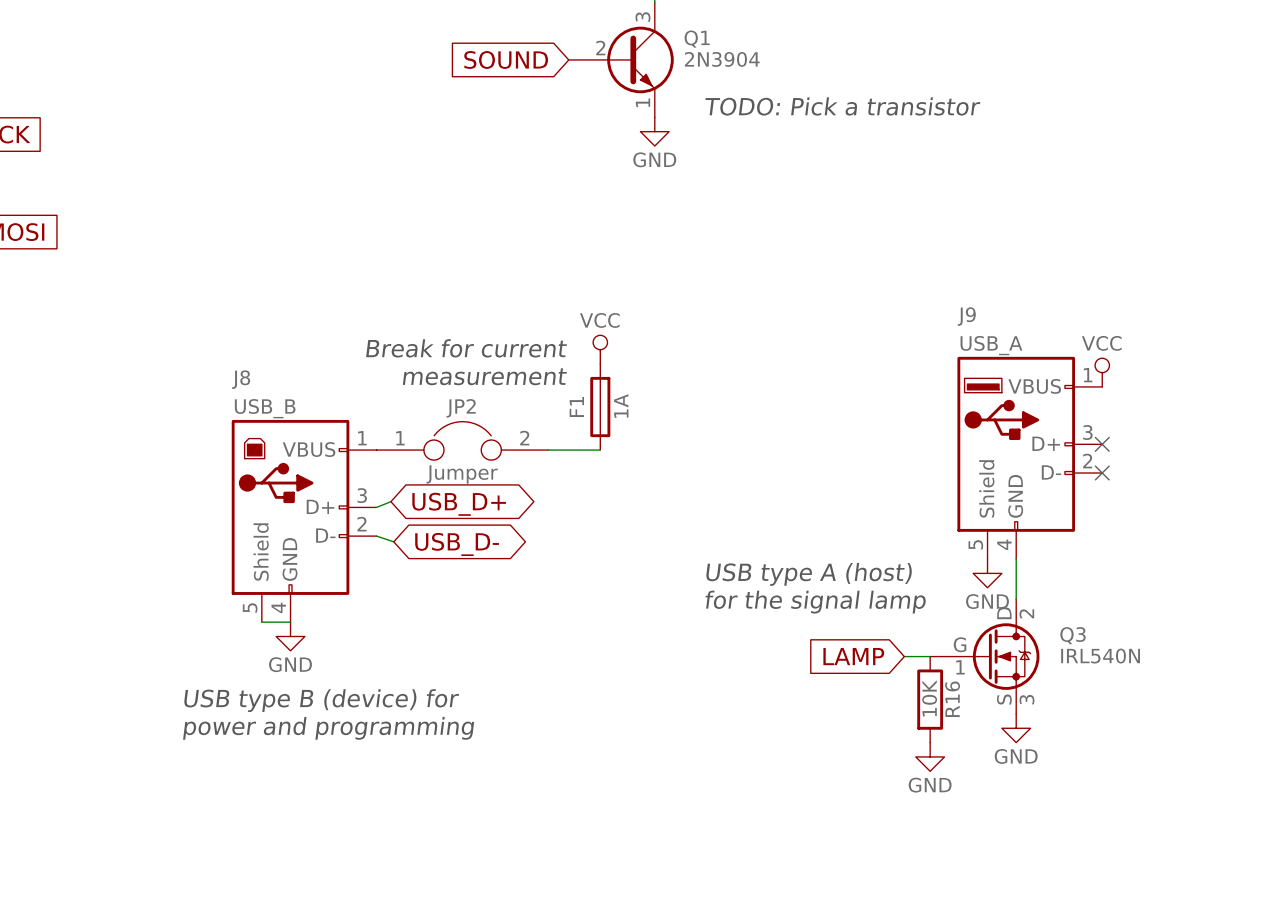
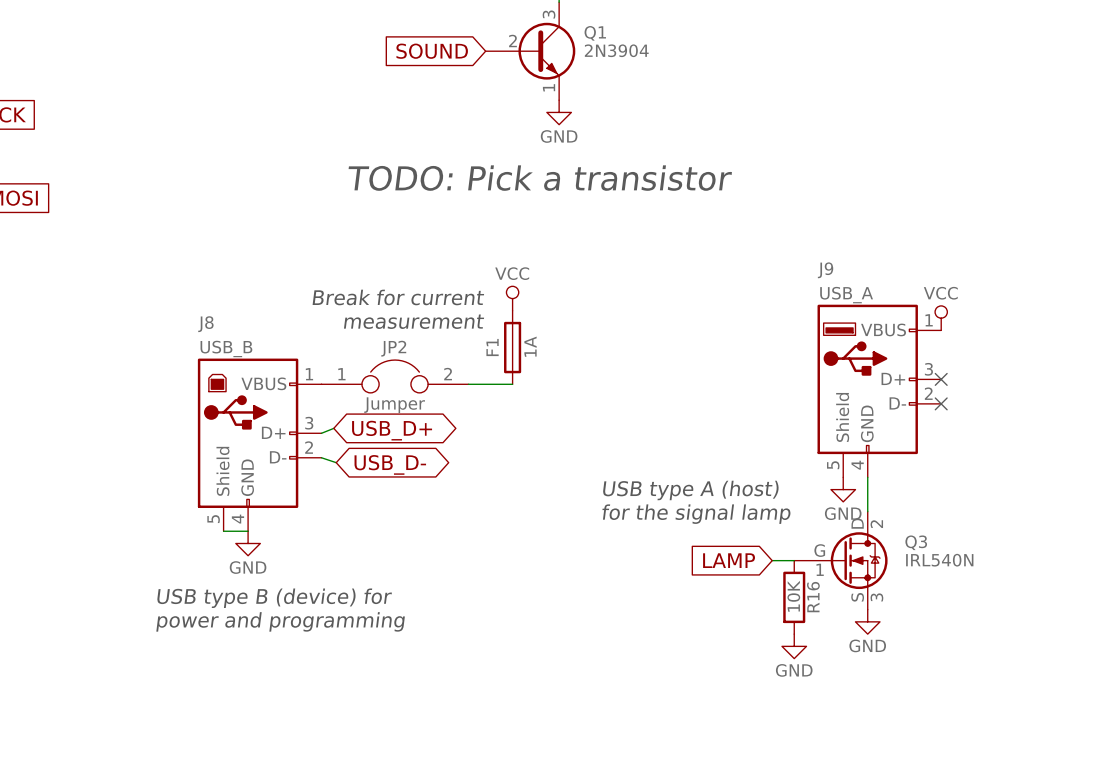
text: TODO: Pick a transistor (842, 106) -> none
text: none -> TODO: Pick a transistor (540, 178)

